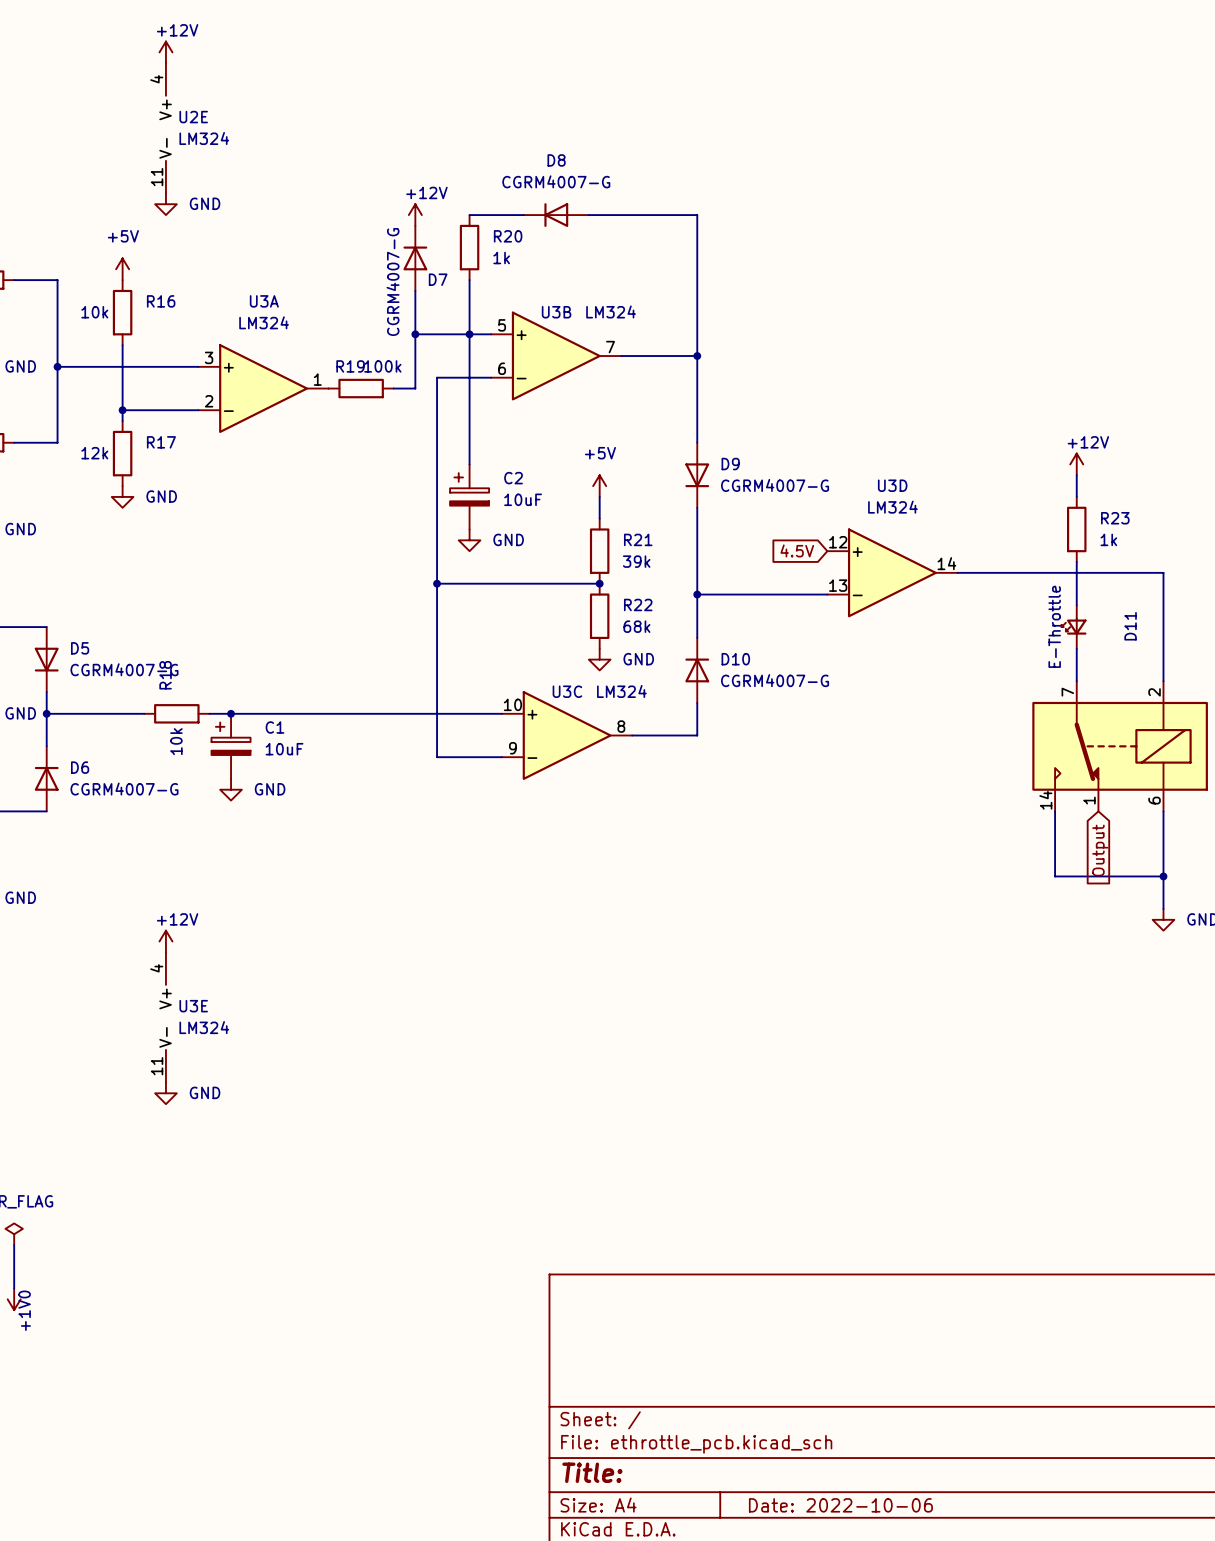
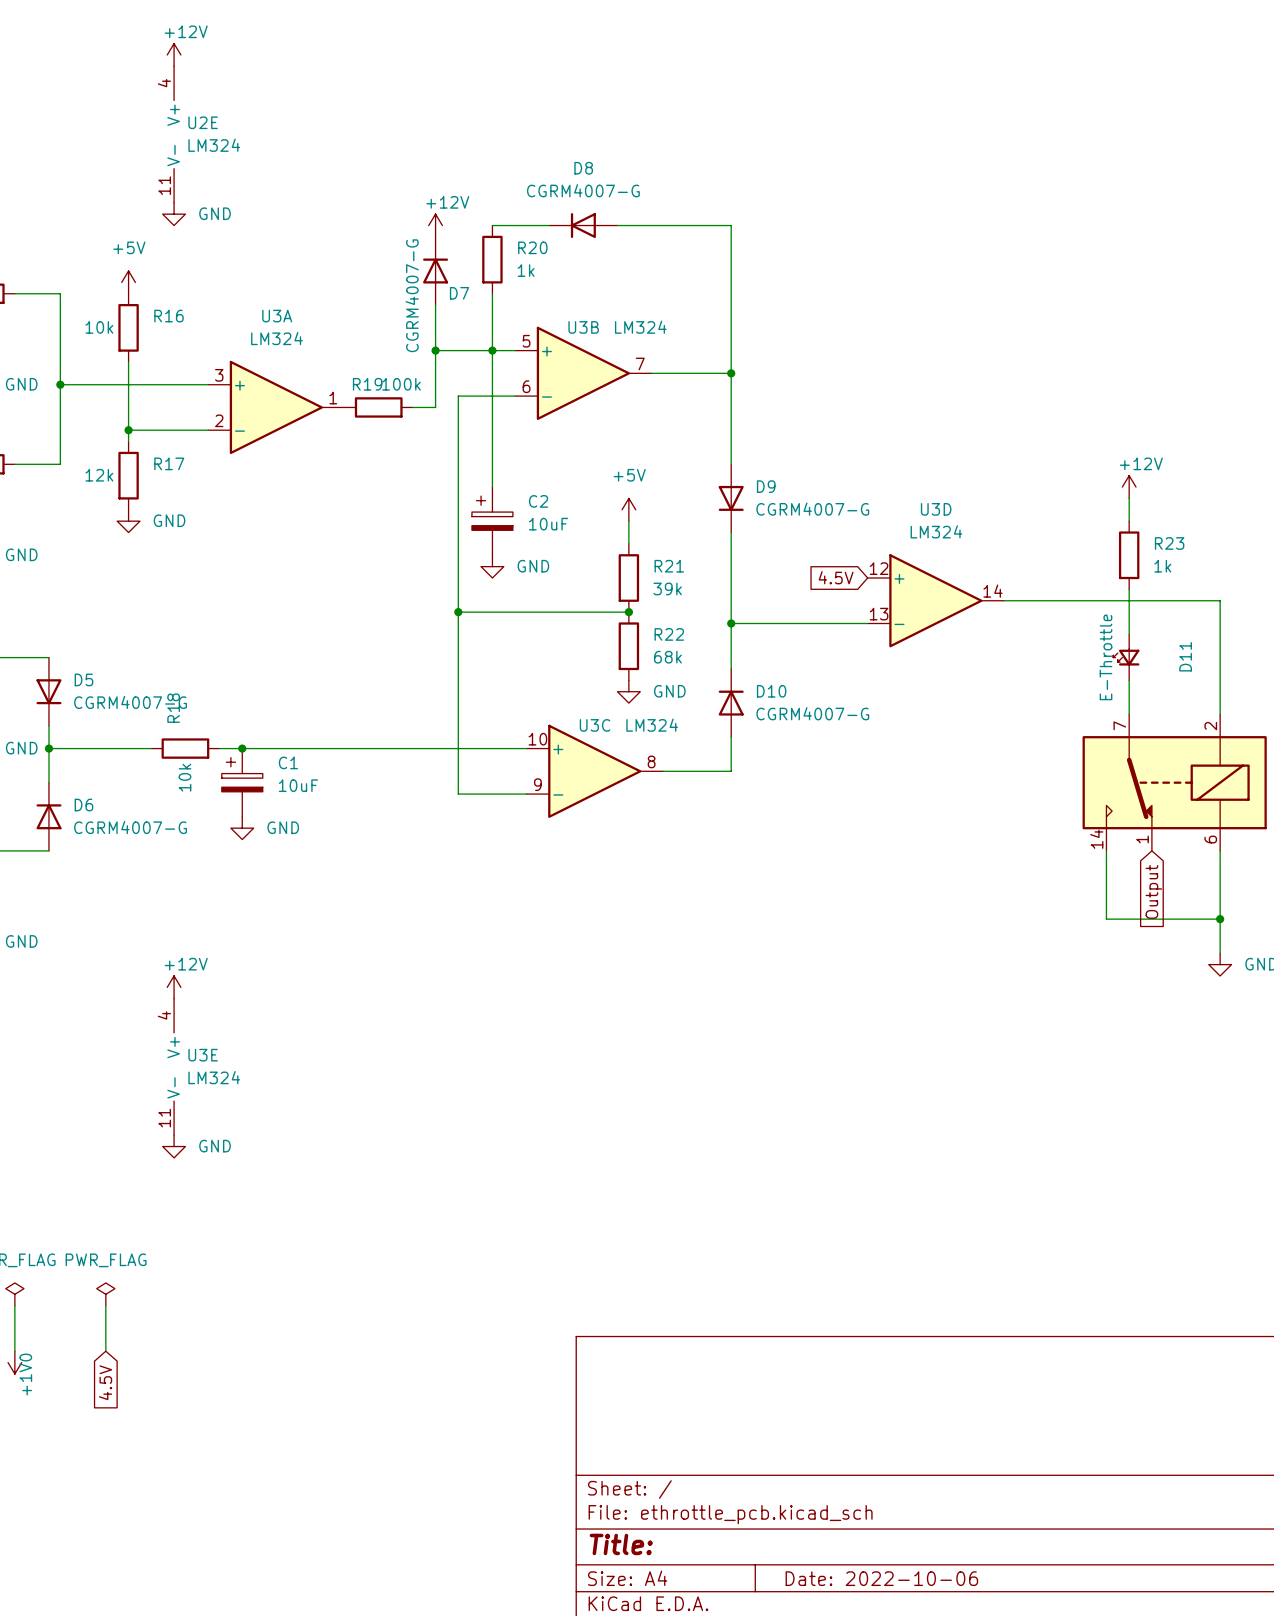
power symbol: none -> PWR_FLAG (105, 1294)
wire: none -> (105, 1305) (105, 1351)
global label: none -> 4.5V (105, 1382)

